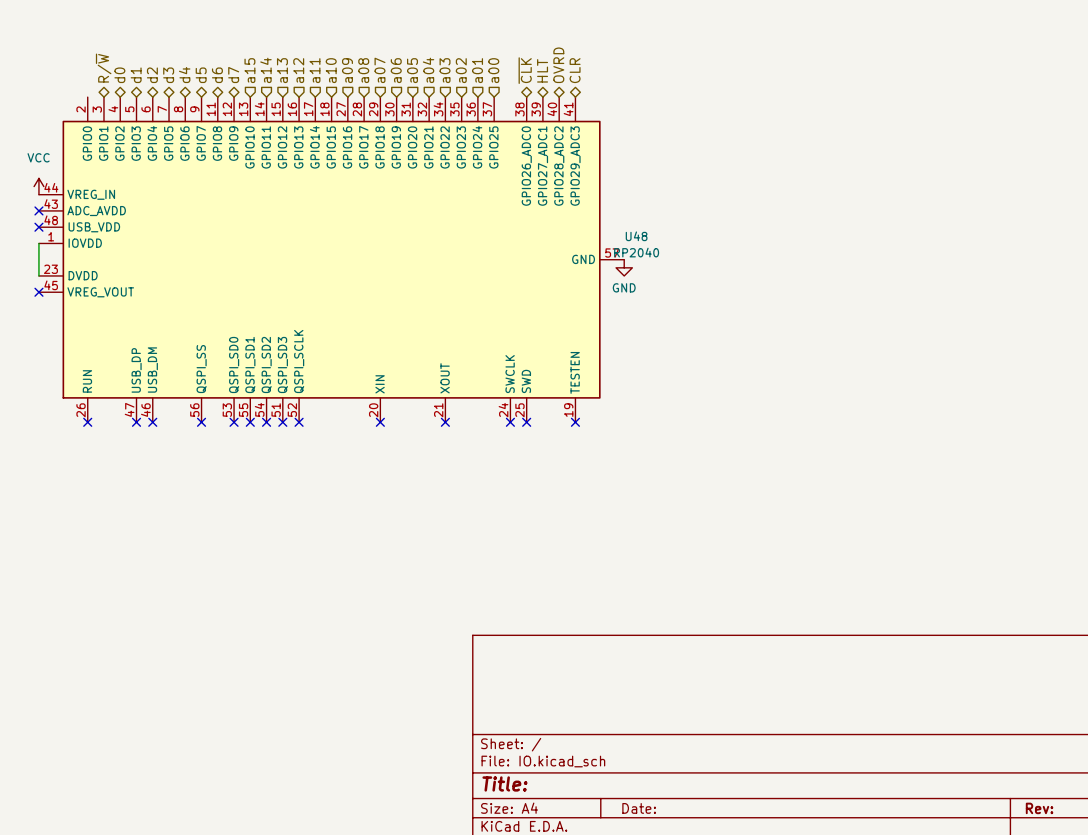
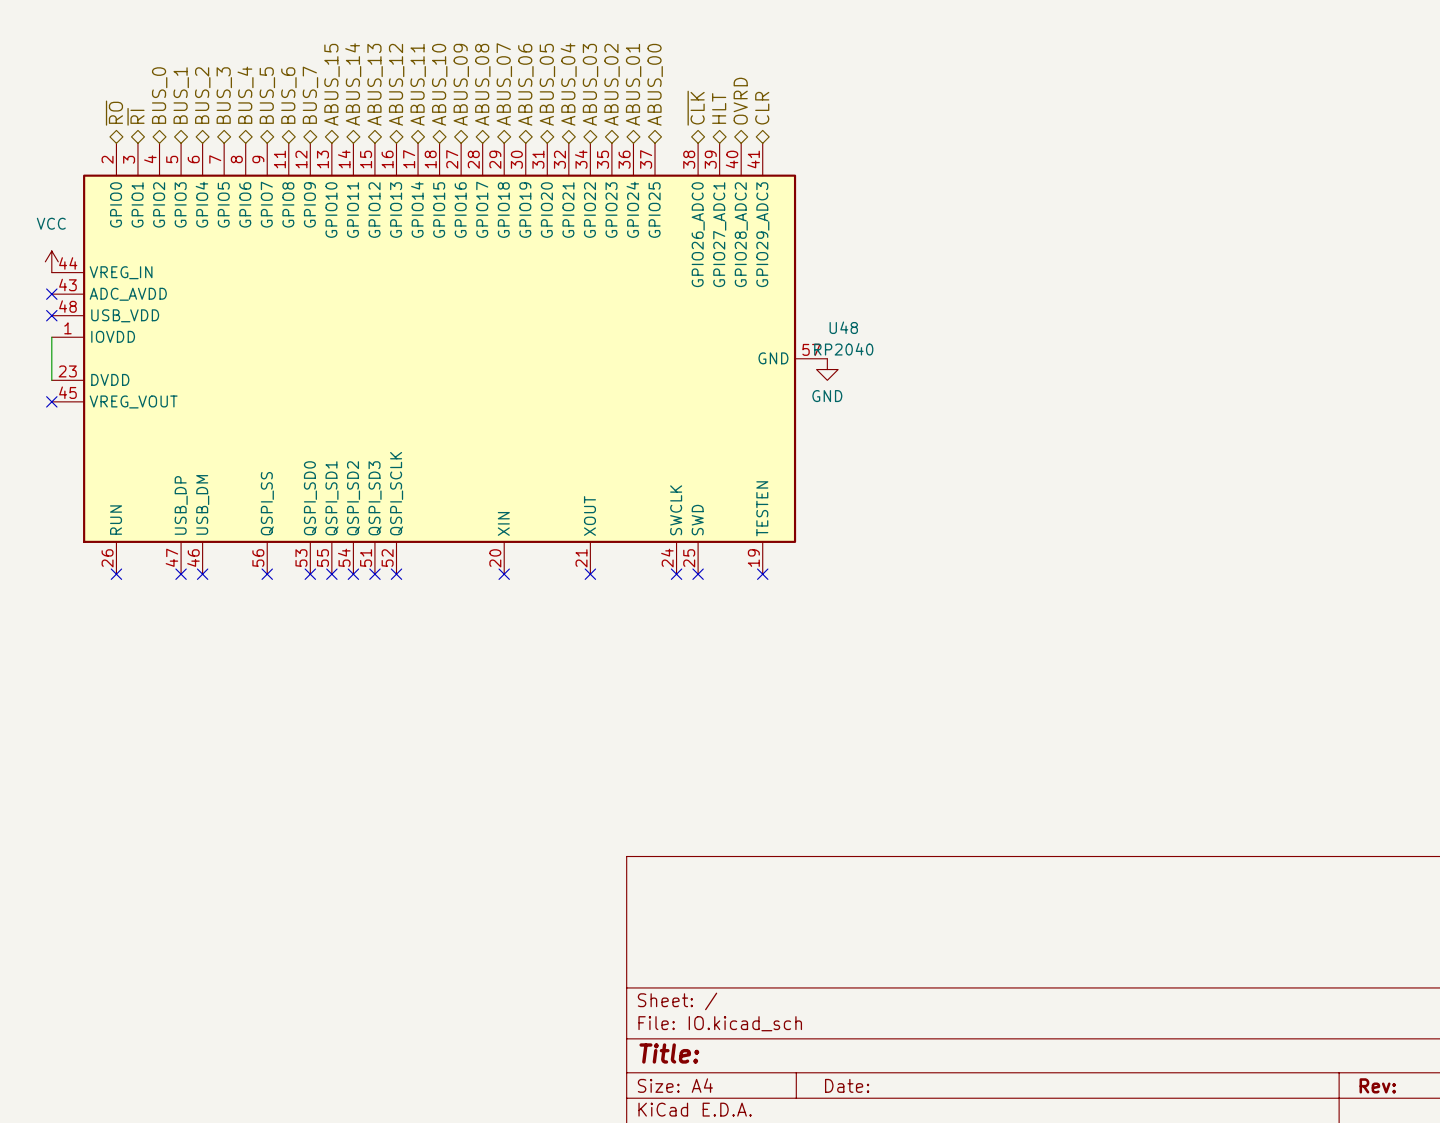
hierarchical label: R/~{W} (103, 68) -> ~{RI} (136, 116)
hierarchical label shape: input (249, 70) -> bidirectional (331, 84)
hierarchical label: a15 (249, 70) -> ABUS_15 (331, 84)
hierarchical label shape: input (265, 70) -> bidirectional (353, 84)
hierarchical label: a14 (265, 70) -> ABUS_14 (353, 84)
hierarchical label shape: input (282, 70) -> bidirectional (375, 84)
hierarchical label: a13 (282, 70) -> ABUS_13 (375, 84)
hierarchical label shape: input (298, 70) -> bidirectional (396, 84)
hierarchical label: a12 (298, 70) -> ABUS_12 (396, 84)
hierarchical label shape: input (314, 70) -> bidirectional (418, 84)
hierarchical label: a11 (314, 70) -> ABUS_11 (418, 84)
hierarchical label shape: input (331, 70) -> bidirectional (439, 84)
hierarchical label: a10 (331, 70) -> ABUS_10 (439, 84)
hierarchical label shape: input (347, 70) -> bidirectional (461, 84)
hierarchical label: a09 (347, 70) -> ABUS_09 (461, 84)
hierarchical label shape: input (363, 70) -> bidirectional (482, 84)
hierarchical label: a08 (363, 70) -> ABUS_08 (482, 84)
hierarchical label shape: input (379, 70) -> bidirectional (504, 84)
hierarchical label: a07 (379, 70) -> ABUS_07 (504, 84)
hierarchical label shape: input (396, 70) -> bidirectional (525, 84)
hierarchical label: a06 (396, 70) -> ABUS_06 (525, 84)
hierarchical label shape: input (412, 70) -> bidirectional (547, 84)
hierarchical label: a05 (412, 70) -> ABUS_05 (547, 84)
hierarchical label shape: input (428, 70) -> bidirectional (568, 84)
hierarchical label: a04 (428, 70) -> ABUS_04 (568, 84)
hierarchical label shape: input (445, 70) -> bidirectional (590, 84)
hierarchical label: a03 (445, 70) -> ABUS_03 (590, 84)
hierarchical label shape: input (461, 70) -> bidirectional (612, 84)
hierarchical label: a02 (461, 70) -> ABUS_02 (612, 84)
hierarchical label shape: input (477, 70) -> bidirectional (633, 84)
hierarchical label: a01 (477, 70) -> ABUS_01 (633, 84)
hierarchical label shape: input (493, 70) -> bidirectional (655, 84)
hierarchical label: a00 (493, 70) -> ABUS_00 (655, 84)
hierarchical label: none -> ~{RO} (114, 113)
hierarchical label: d0 (119, 75) -> BUS_0 (159, 95)
hierarchical label: d1 (136, 75) -> BUS_1 (181, 95)
hierarchical label: d2 (152, 75) -> BUS_2 (202, 95)
hierarchical label: d3 (168, 75) -> BUS_3 (224, 95)
hierarchical label: d4 (184, 75) -> BUS_4 (245, 95)
hierarchical label: d5 (201, 75) -> BUS_5 (267, 95)
hierarchical label: d6 (217, 75) -> BUS_6 (288, 95)
hierarchical label: d7 (233, 75) -> BUS_7 (310, 95)

